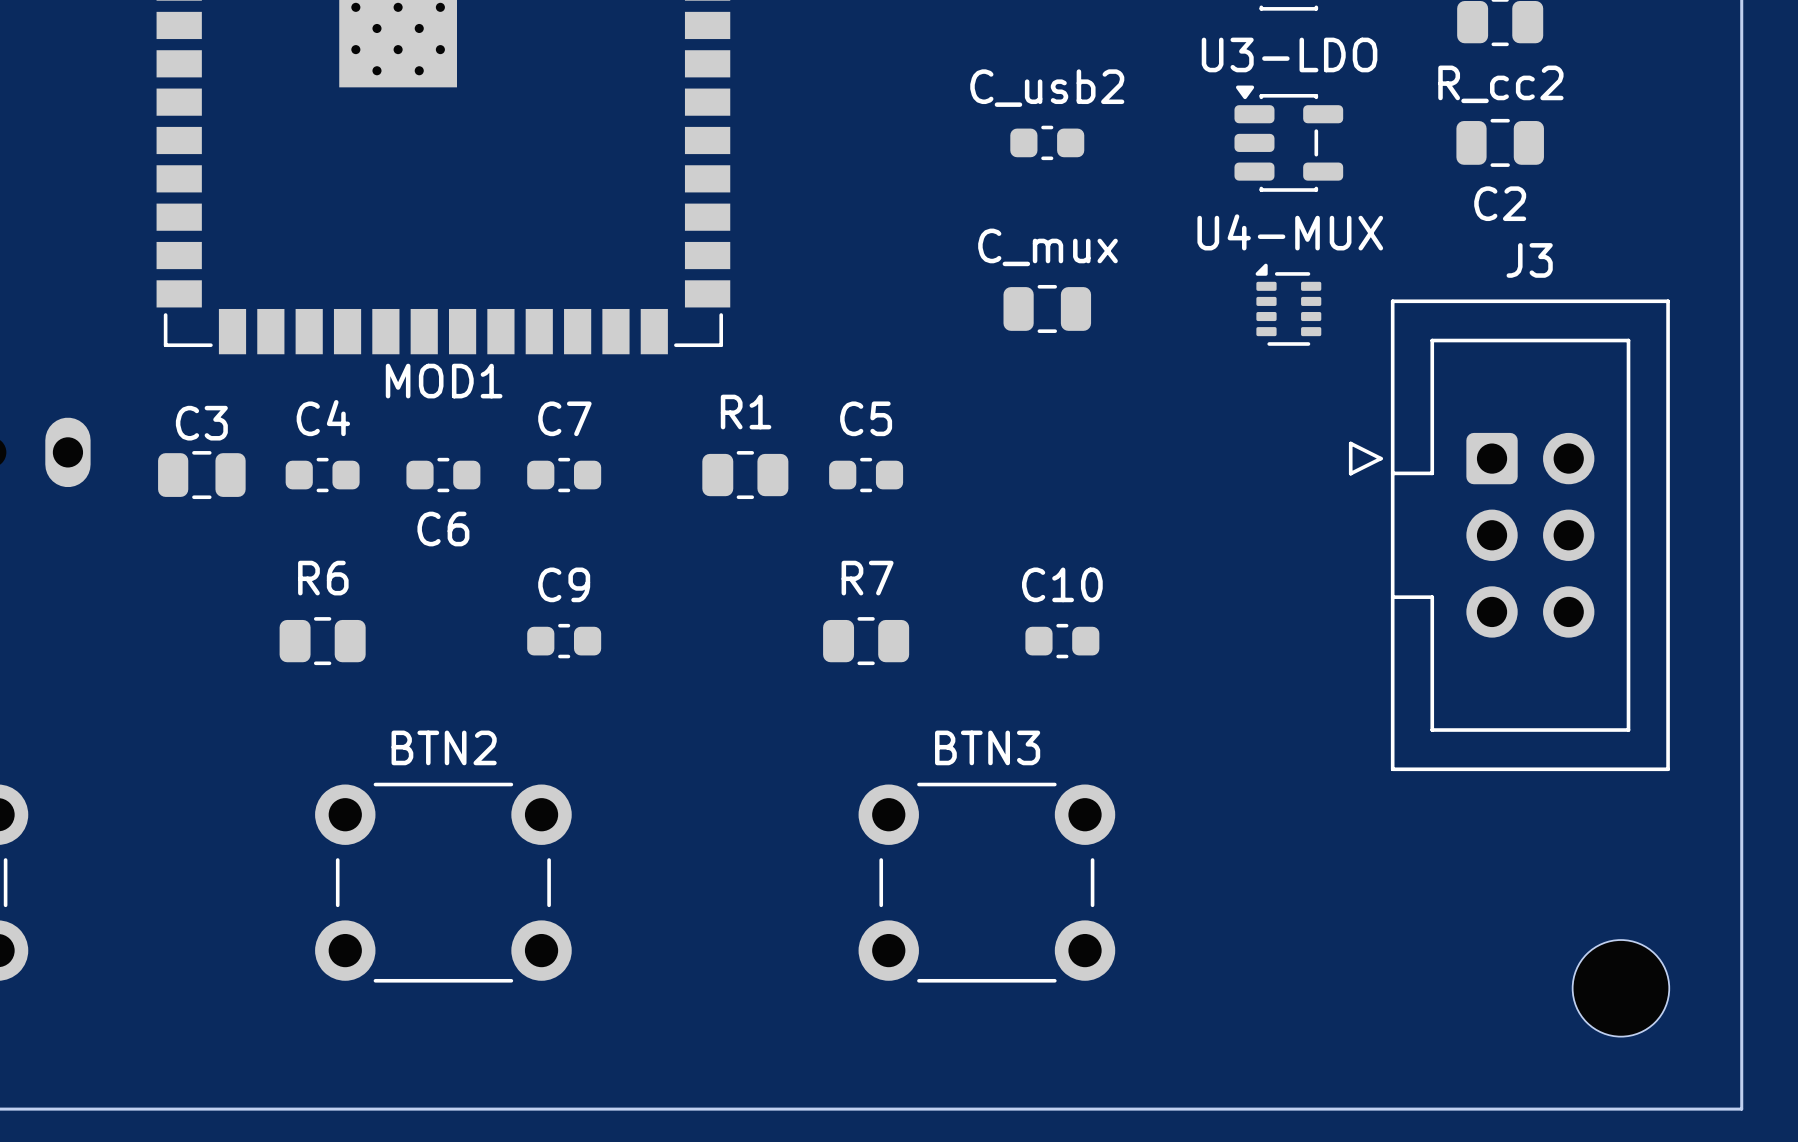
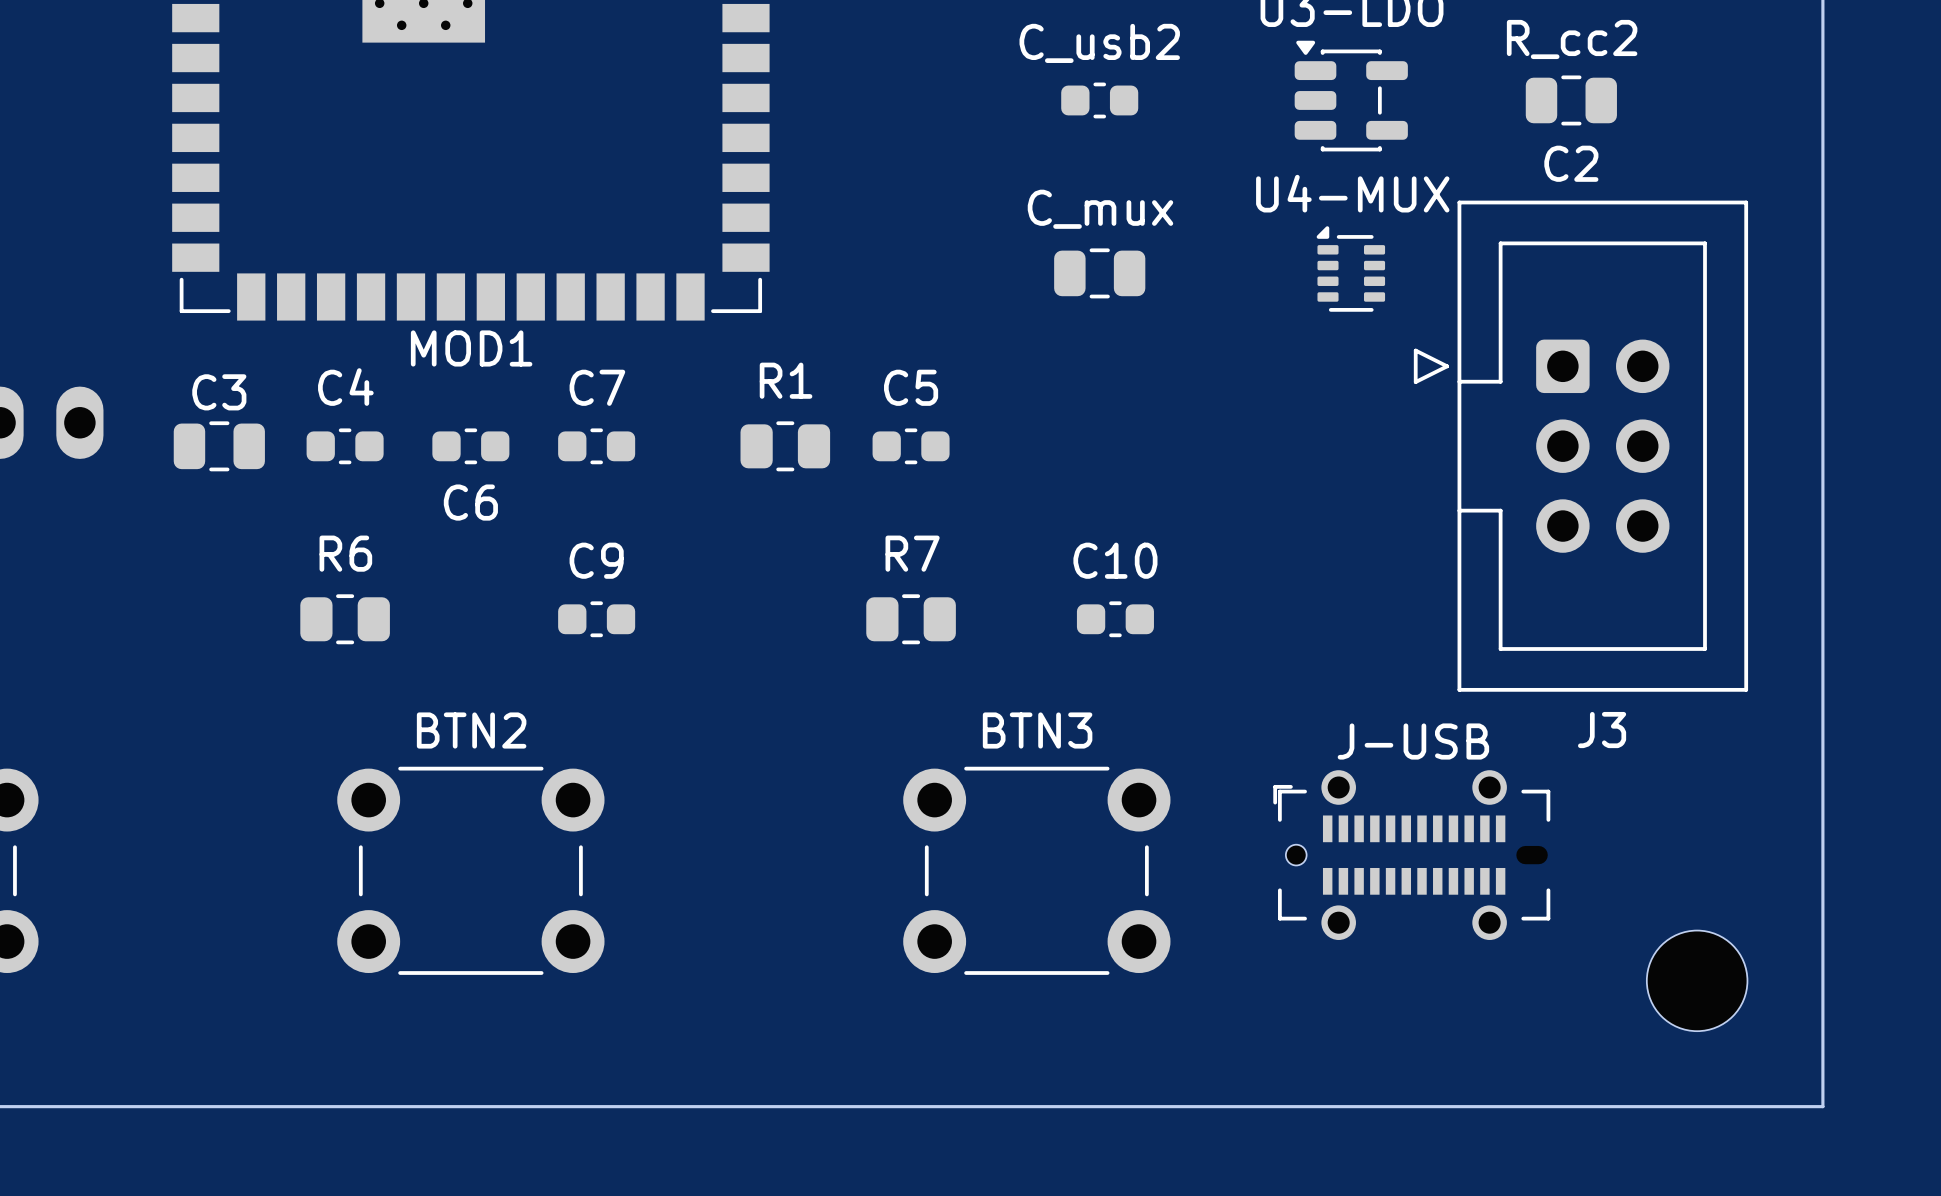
J3 name position: J3 (1529, 260) -> J3 (1602, 730)
J3 position: (1509, 535) -> (1580, 446)
J-USB: none -> (1411, 855)

